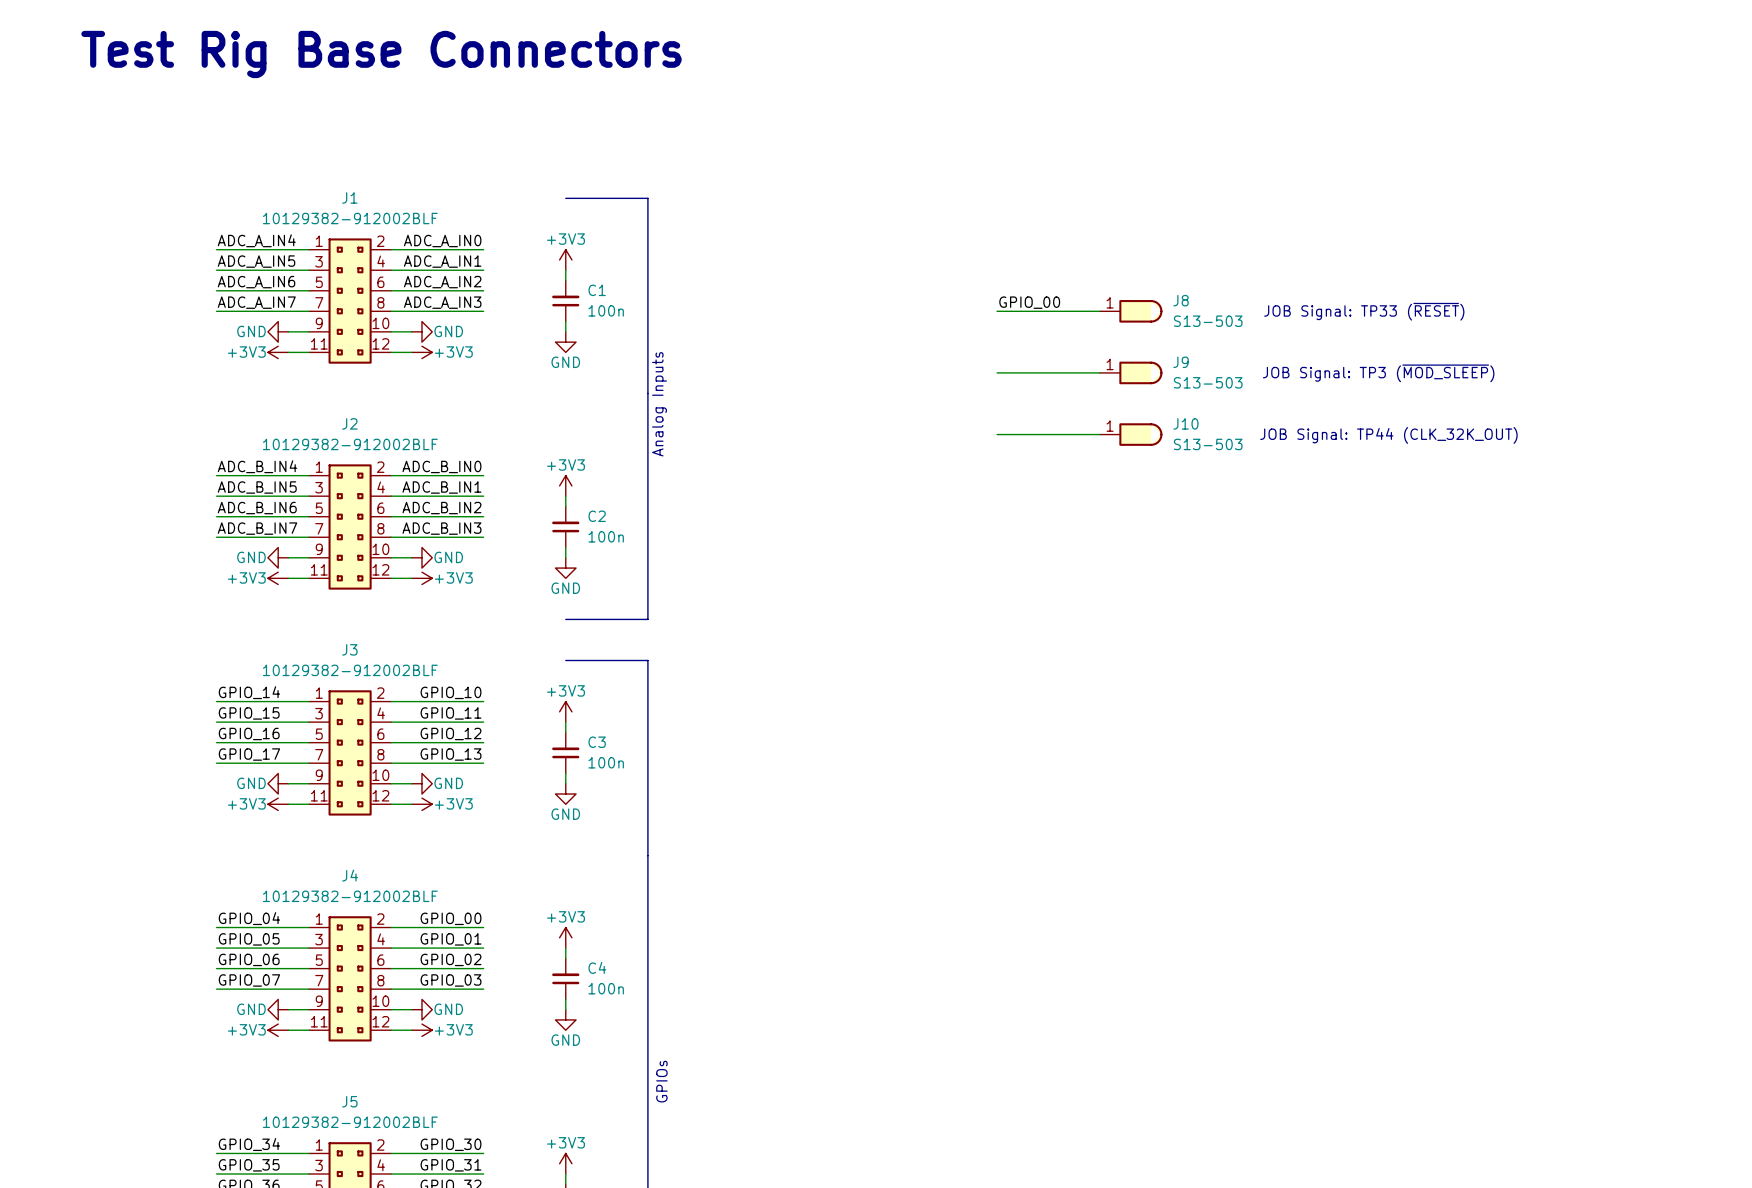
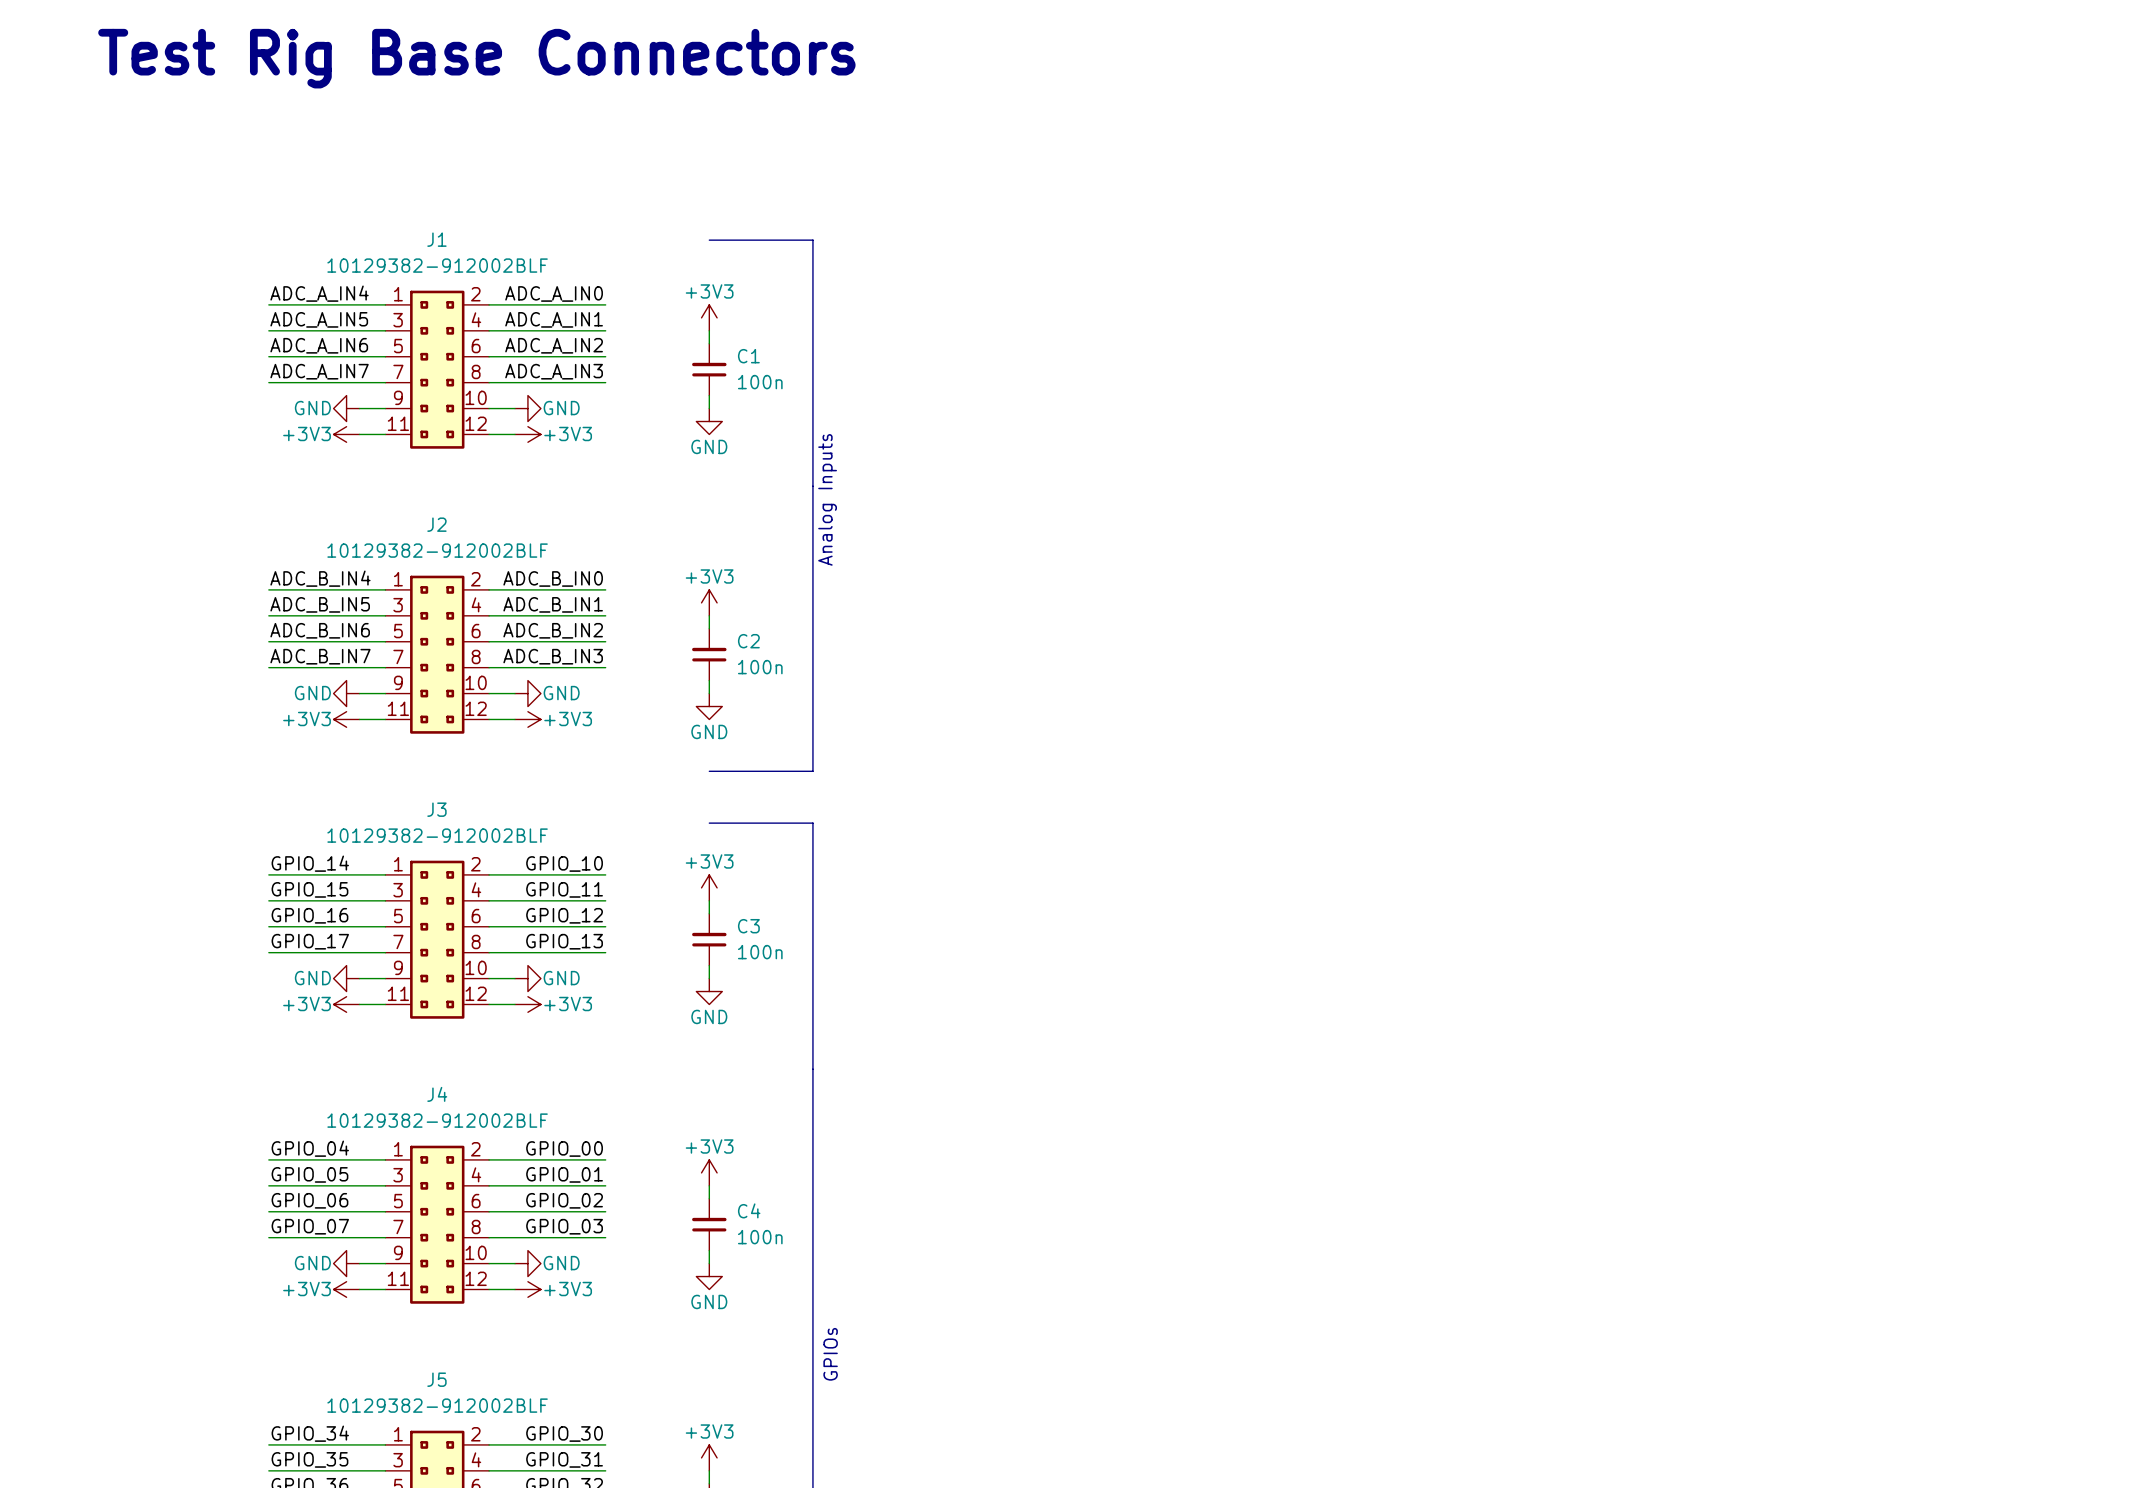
label: GPIO_00 (1029, 302) -> none
wire: (997, 311) (1099, 311) -> none
J8: (1131, 311) -> none
text: JOB Signal: TP33 (~{RESET}) (1364, 311) -> none
wire: (997, 372) (1099, 372) -> none
J9: (1131, 372) -> none
text: JOB Signal: TP3 (~{MOD_SLEEP}) (1378, 373) -> none
wire: (997, 434) (1099, 434) -> none
J10: (1131, 434) -> none
text: JOB Signal: TP44 (CLK_32K_OUT) (1388, 435) -> none

